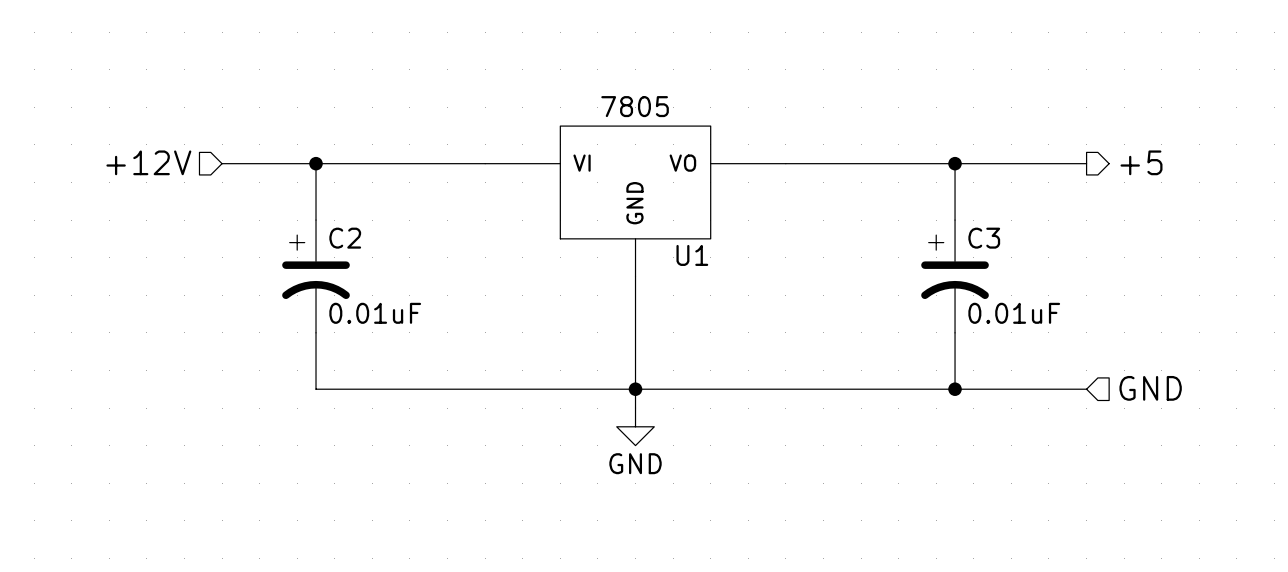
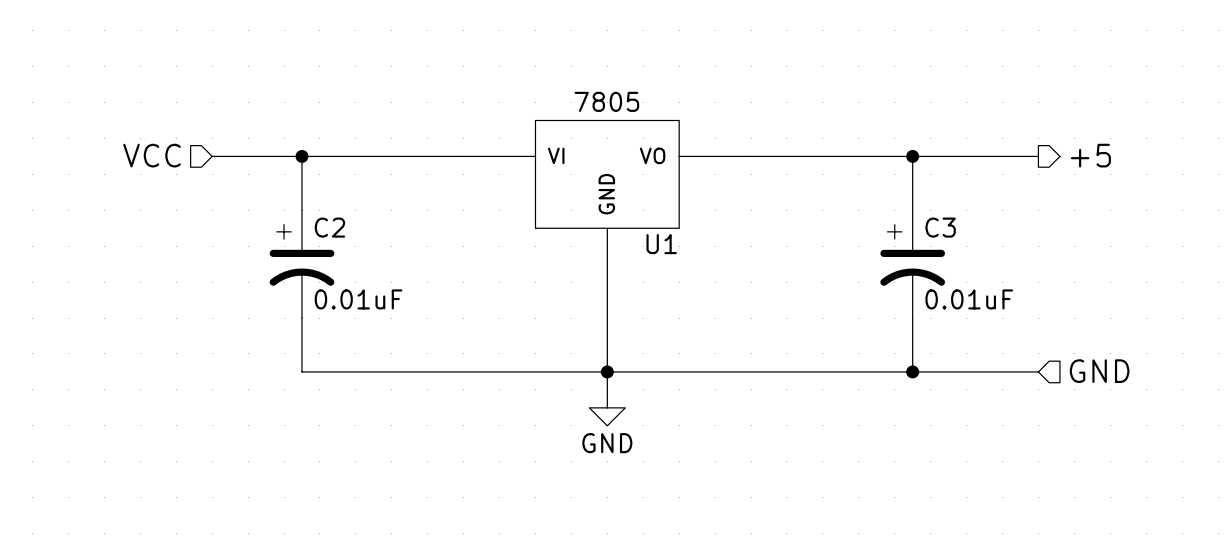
hierarchical label: +12V (148, 162) -> VCC (152, 155)

